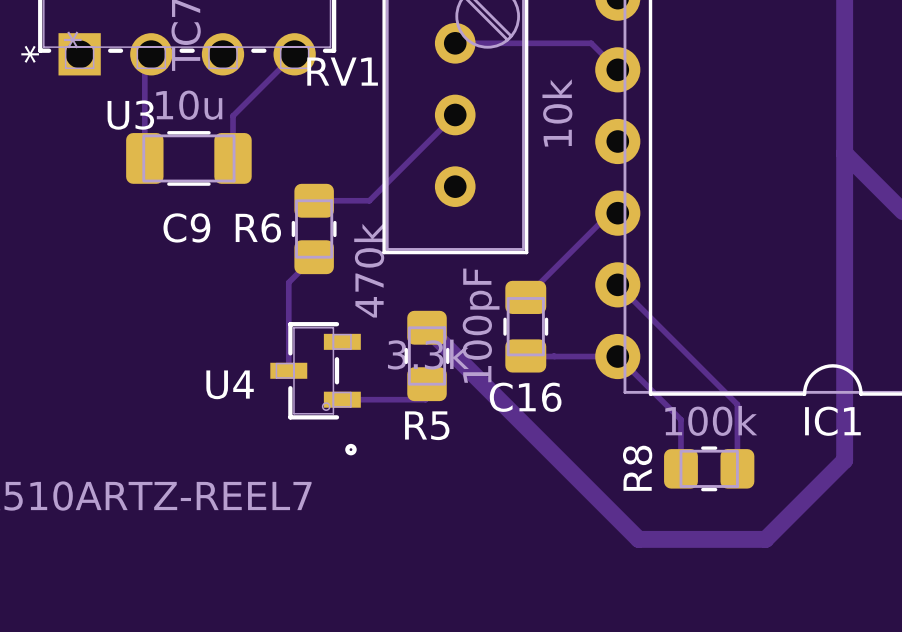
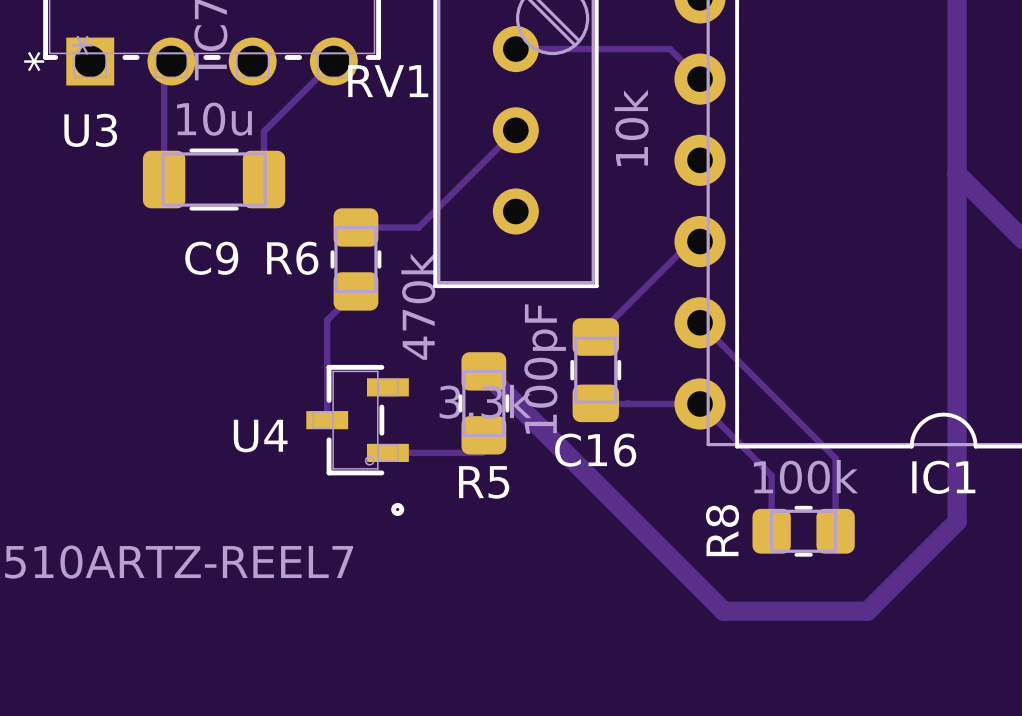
U3 name position: U3 (130, 115) -> U3 (90, 130)

